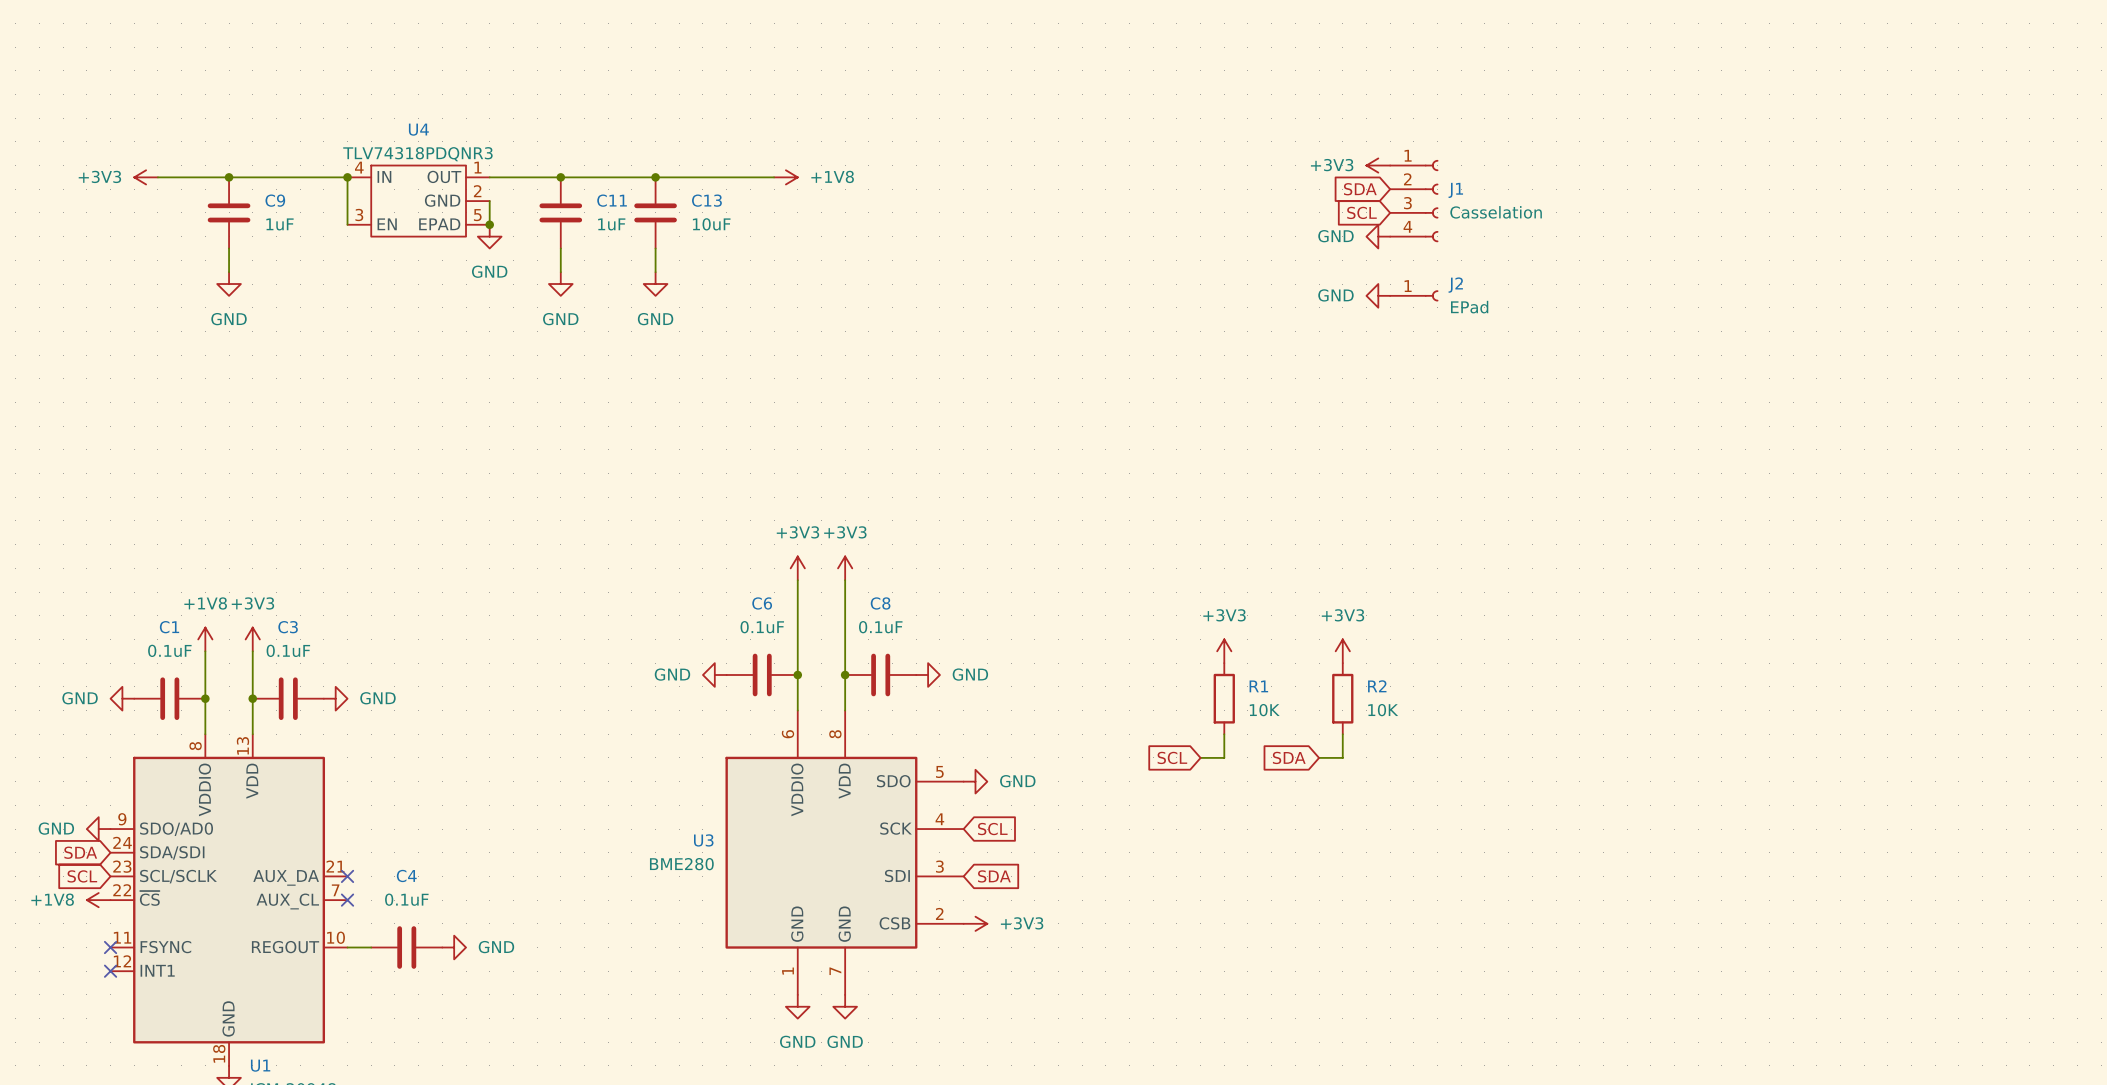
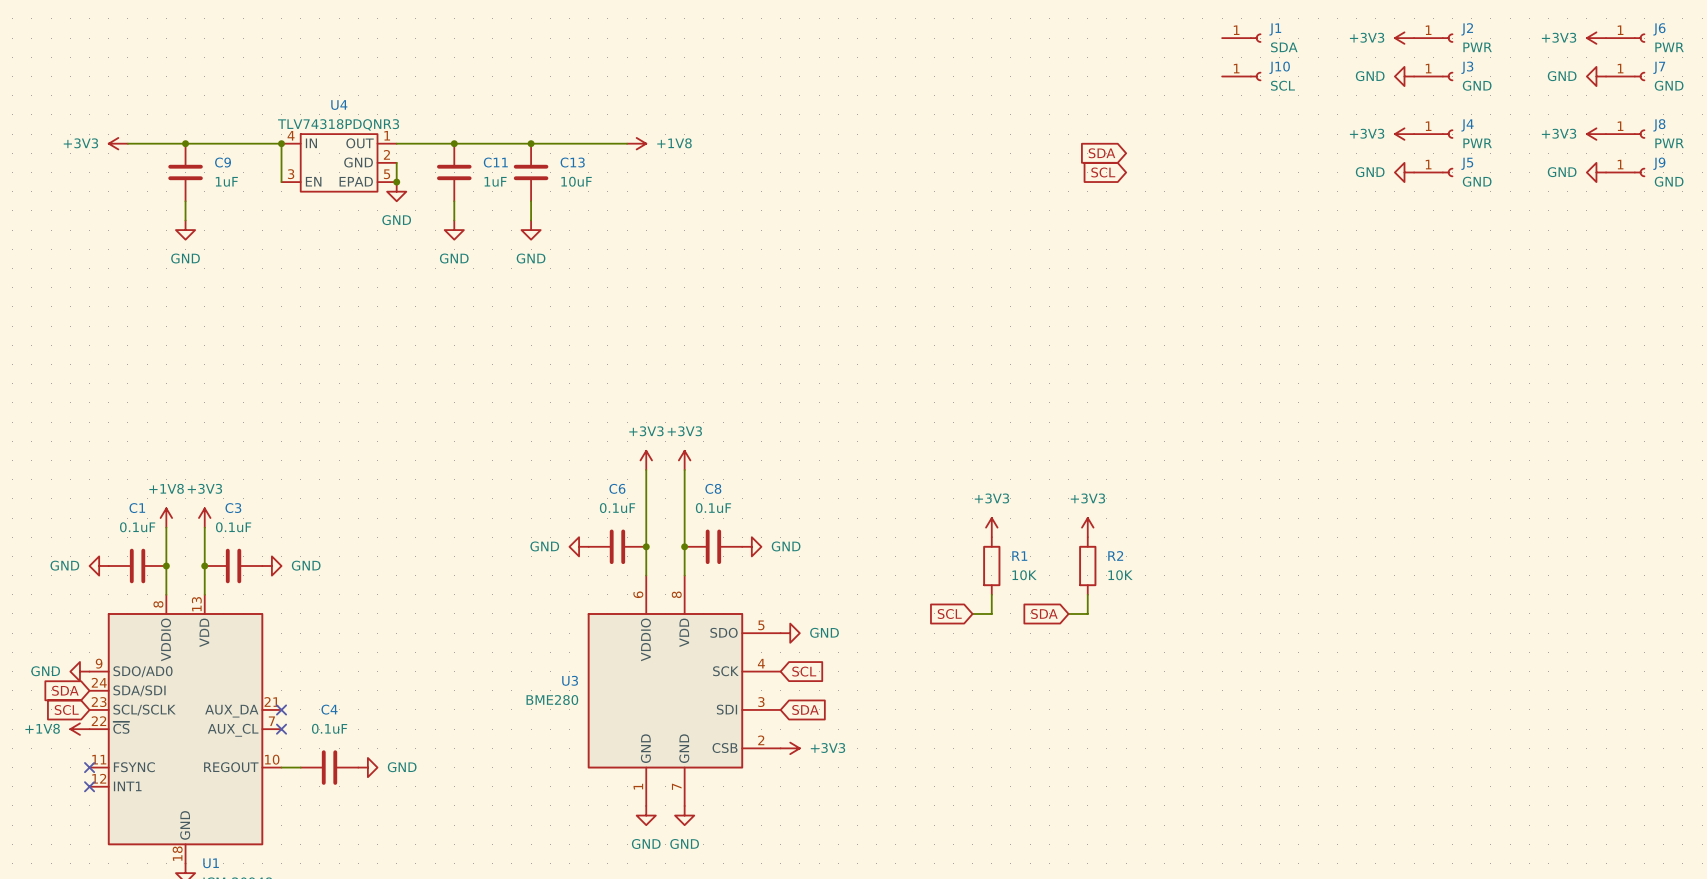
power symbol: none -> +3V3 (1404, 38)
power symbol: none -> +3V3 (1596, 38)
J6: none -> PWR (1625, 38)
J10: none -> SCL (1241, 76)
power symbol: none -> GND (1404, 76)
J3: none -> GND (1433, 76)
power symbol: none -> GND (1596, 76)
J7: none -> GND (1625, 76)
J1 symbol: [1390, 160, 1439, 243] -> [1222, 33, 1262, 43]
power symbol: +3V3 (1378, 165) -> none
power symbol: none -> +3V3 (1404, 134)
J4: none -> PWR (1433, 134)
power symbol: none -> +3V3 (1596, 134)
J8: none -> PWR (1625, 134)
J1 value: Casselation (1496, 212) -> SDA (1284, 47)
power symbol: none -> GND (1404, 172)
J5: none -> GND (1433, 172)
power symbol: none -> GND (1596, 172)
J9: none -> GND (1625, 172)
power symbol: GND (1378, 236) -> none
power symbol: GND (1378, 295) -> none
J2 position: (1414, 295) -> (1433, 38)
J2 value: EPad (1469, 307) -> PWR (1477, 47)

